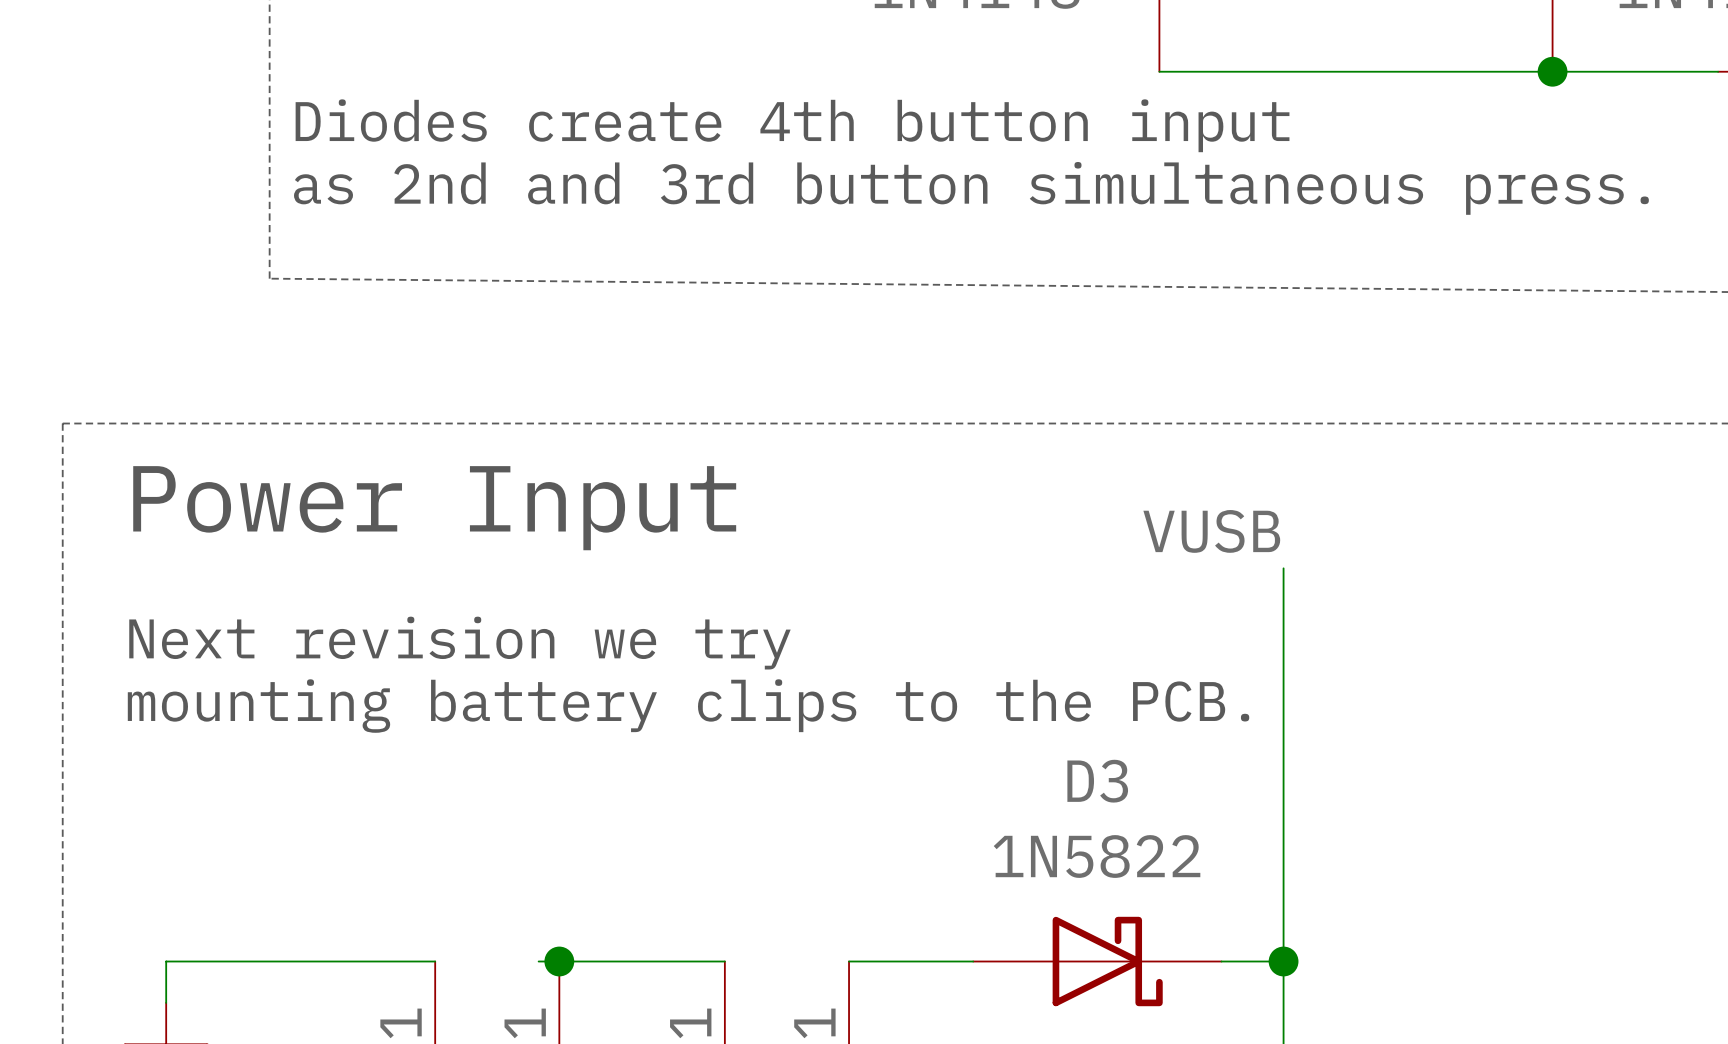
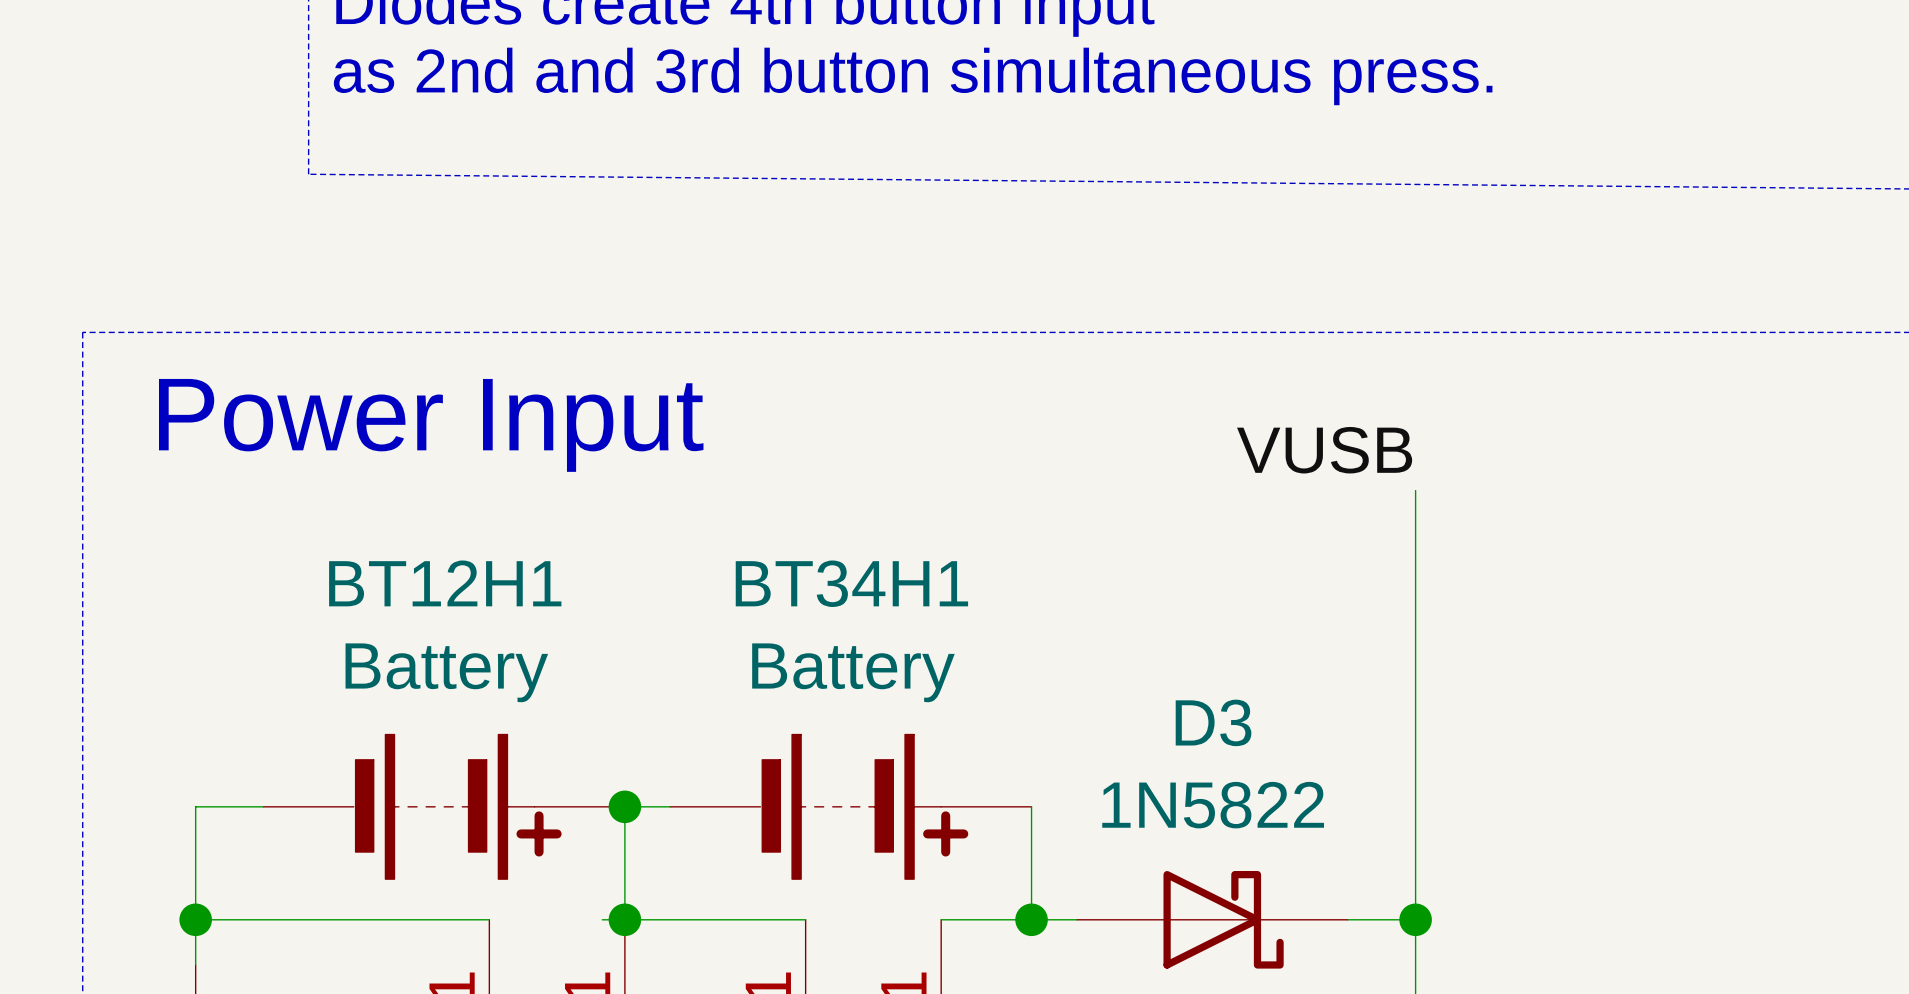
text: Next revision we try (459, 643) -> none
text: mounting battery clips to the PCB. (688, 706) -> none
wire: none -> (263, 806) (195, 806) (195, 919)
BT12H1: none -> Battery (444, 806)
junction: none -> (624, 806)
wire: none -> (670, 806) (624, 806) (624, 919)
BT34H1: none -> Battery (850, 806)
wire: none -> (1031, 806) (1031, 919)
junction: none -> (195, 919)
junction: none -> (1031, 919)

